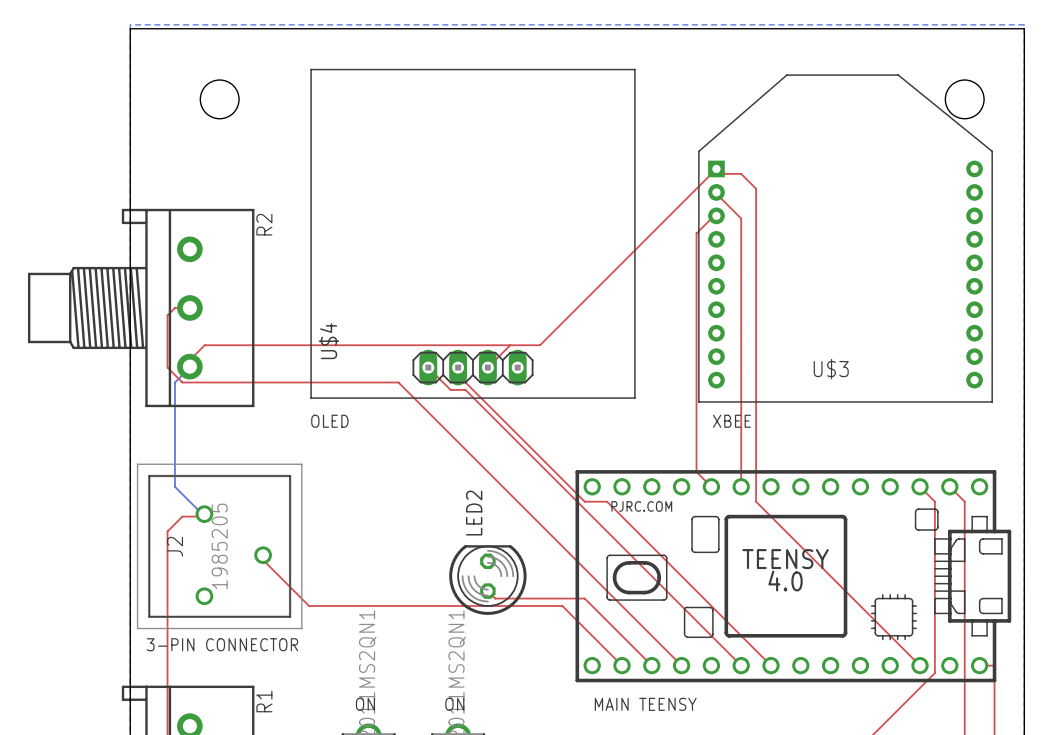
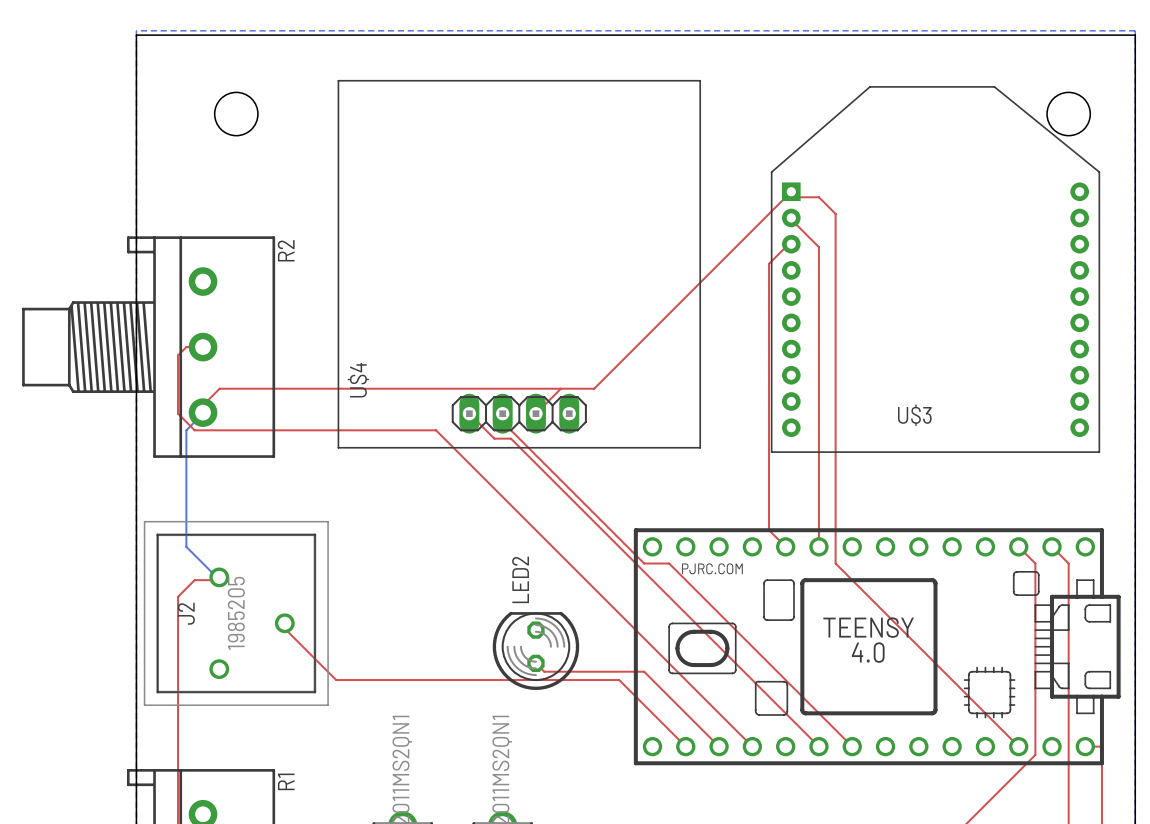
text: OLED (329, 421) -> none
text: XBEE (731, 421) -> none
text: 3-PIN CONNECTOR (222, 644) -> none
text: ON (365, 704) -> none
text: ON (454, 704) -> none
text: MAIN TEENSY (645, 704) -> none

